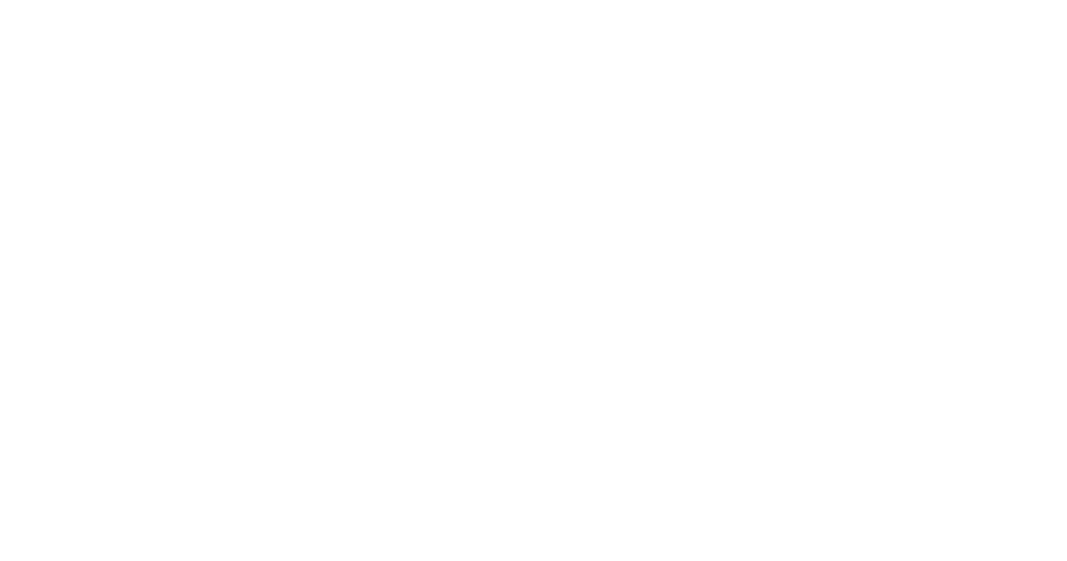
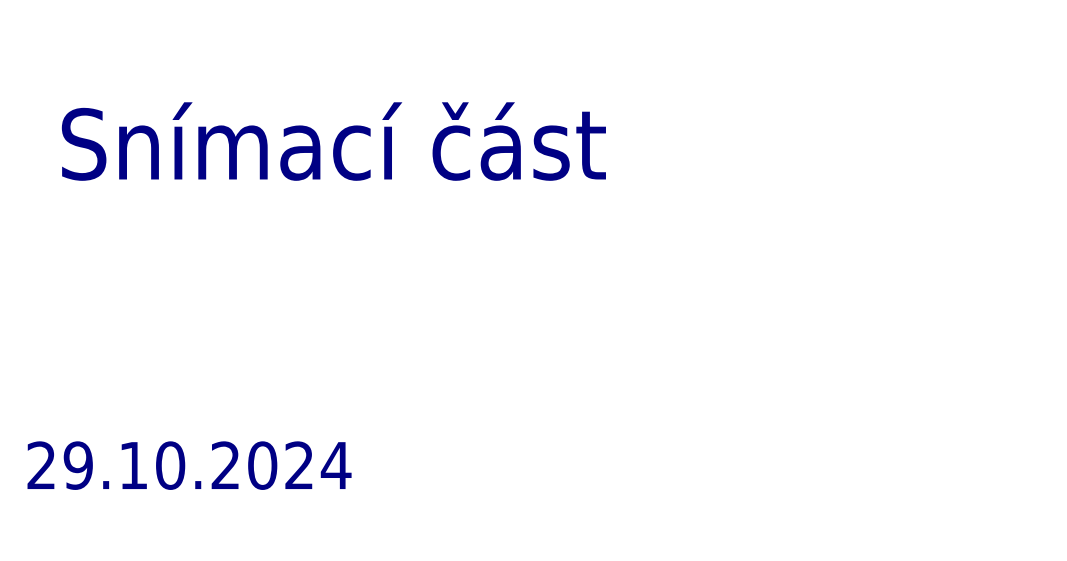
text: none -> Snímací část (333, 141)
text: none -> 29.10.2024 (189, 465)

